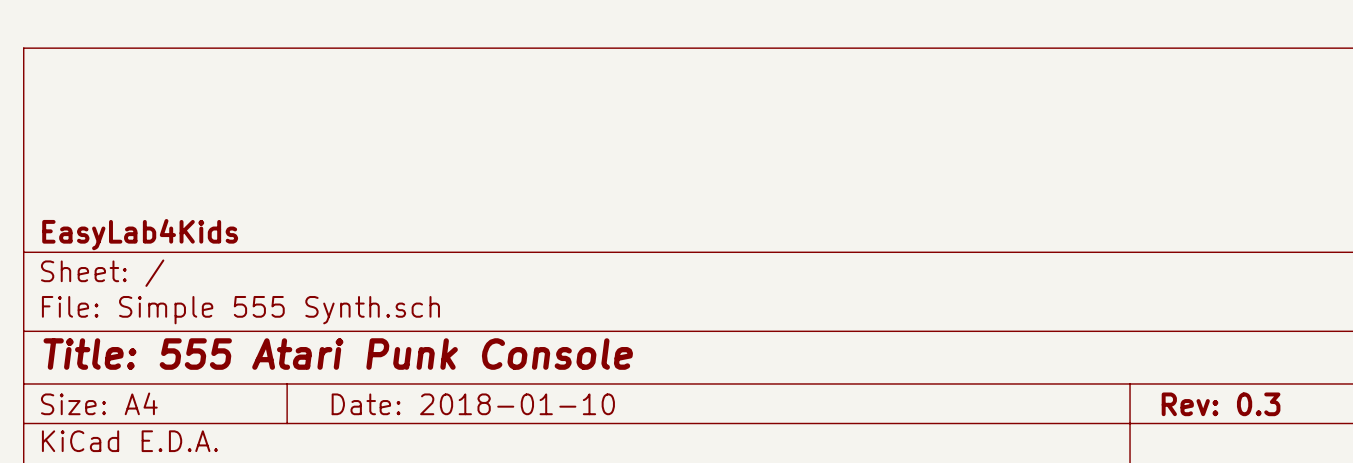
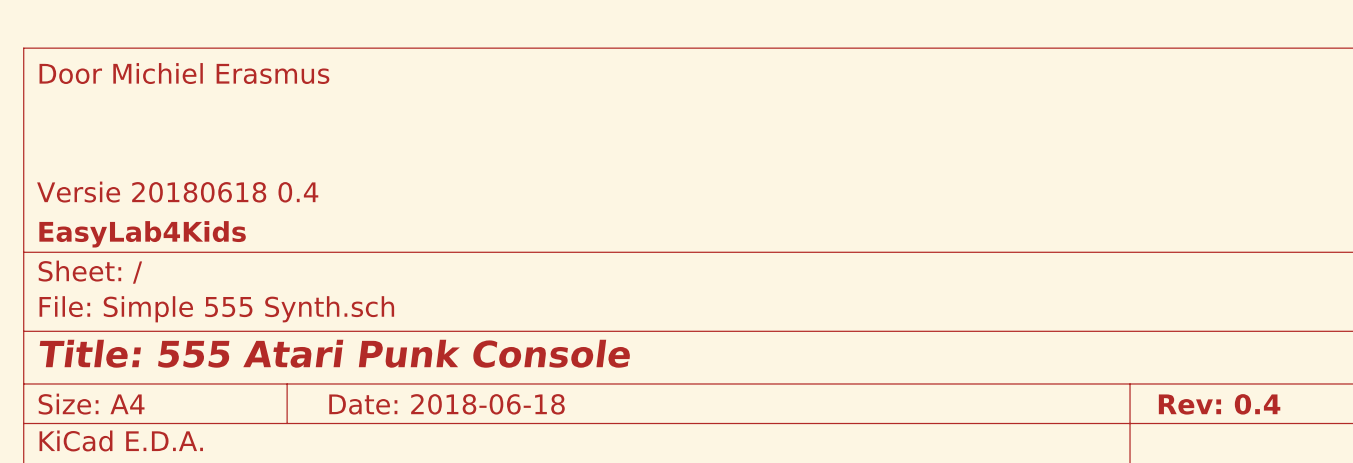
title block: none -> Door Michiel Erasmus (184, 73)
title block: none -> Versie 20180618 0.4 (177, 192)
title block: Date: 2018-01-10 (473, 404) -> Date: 2018-06-18 (447, 404)
title block: Rev: 0.3 (1221, 404) -> Rev: 0.4 (1219, 404)

